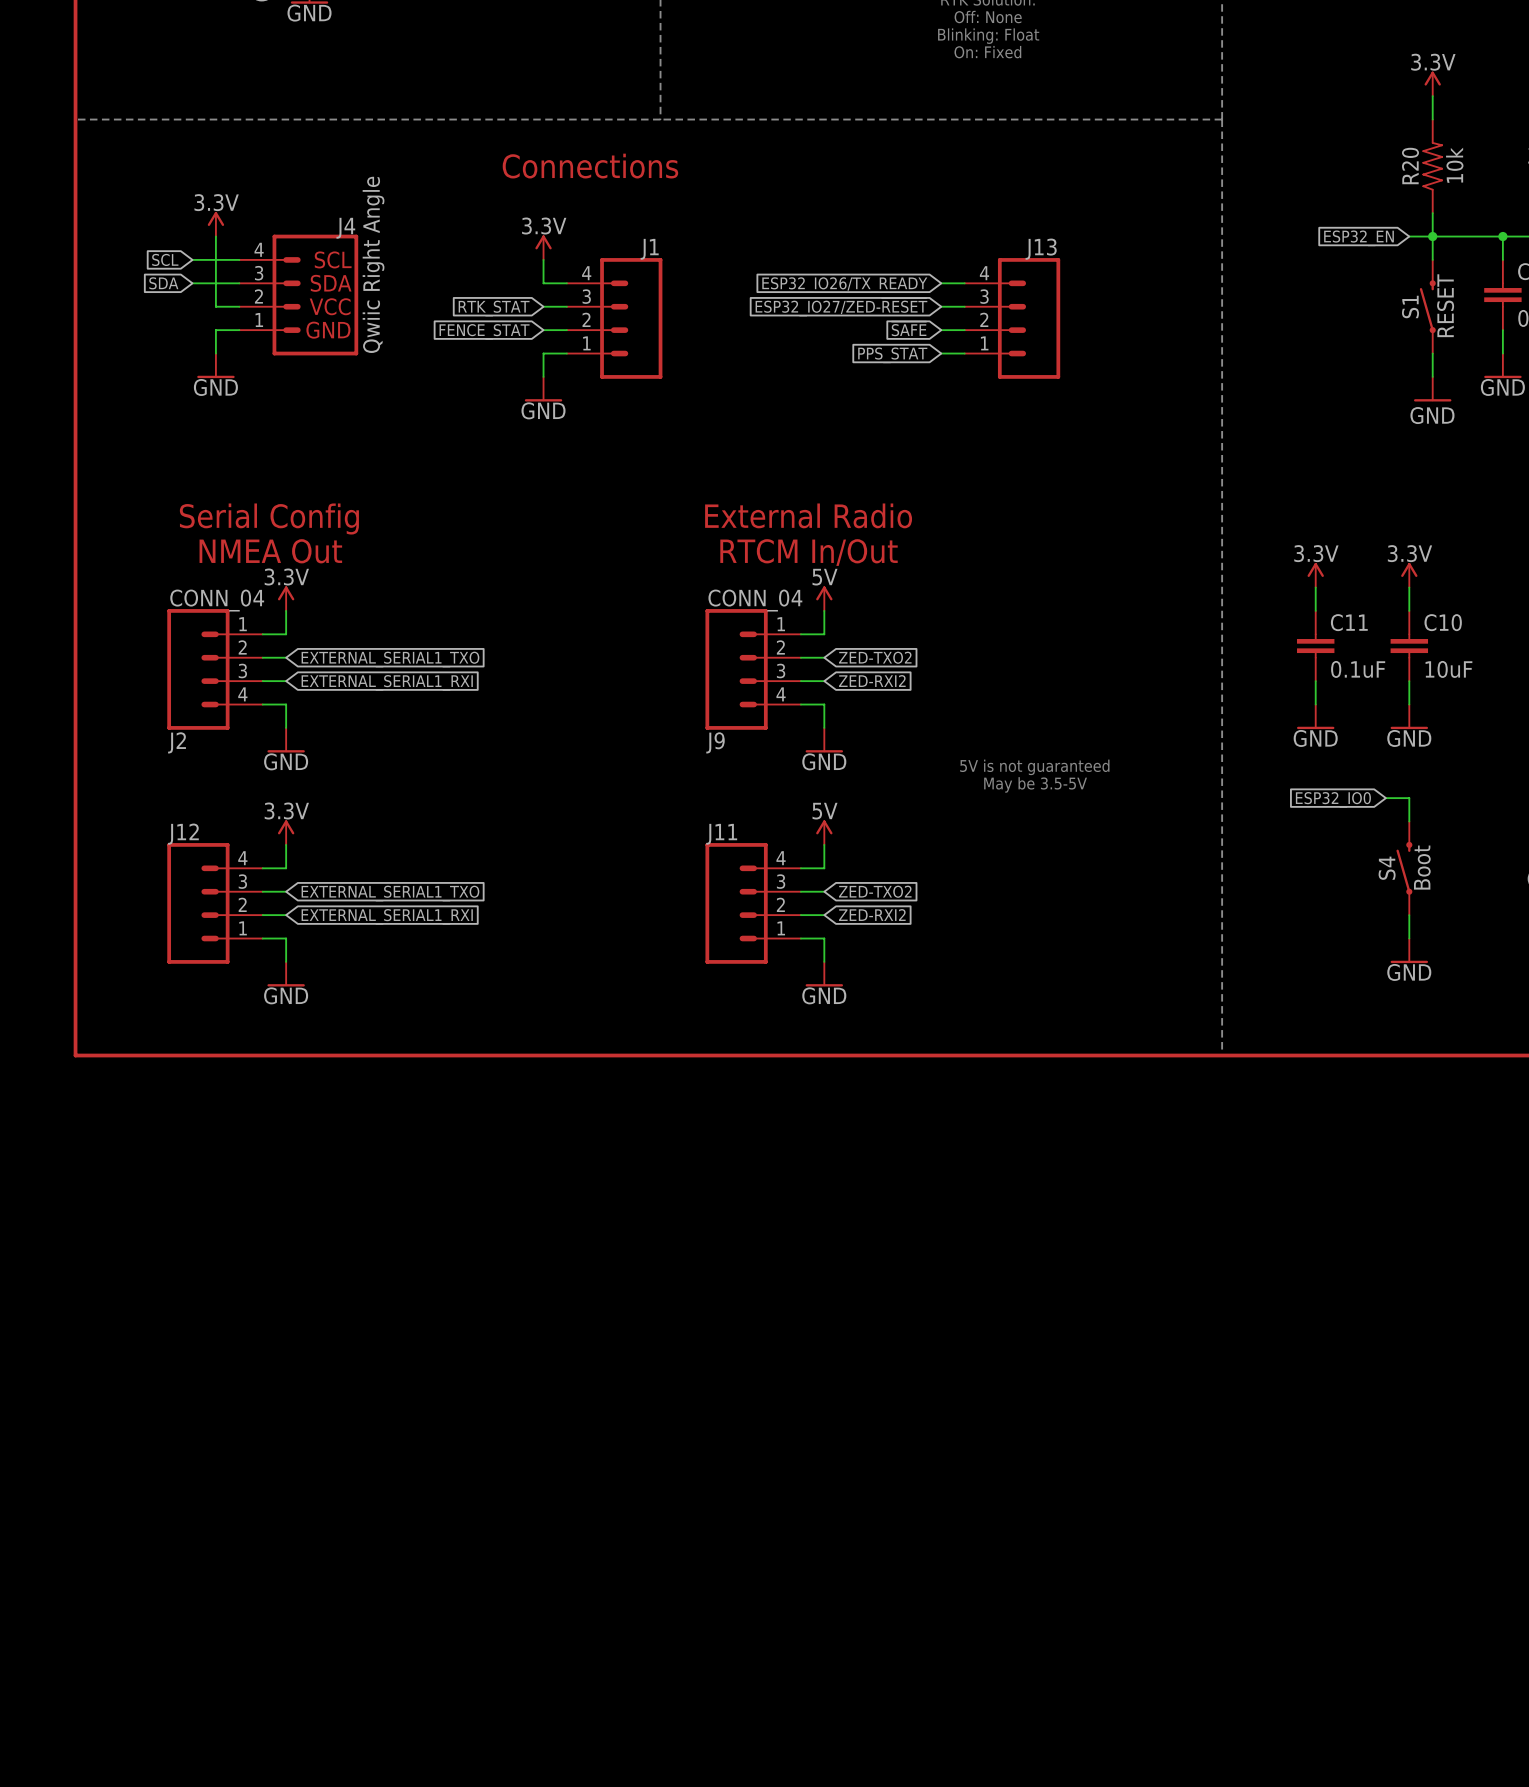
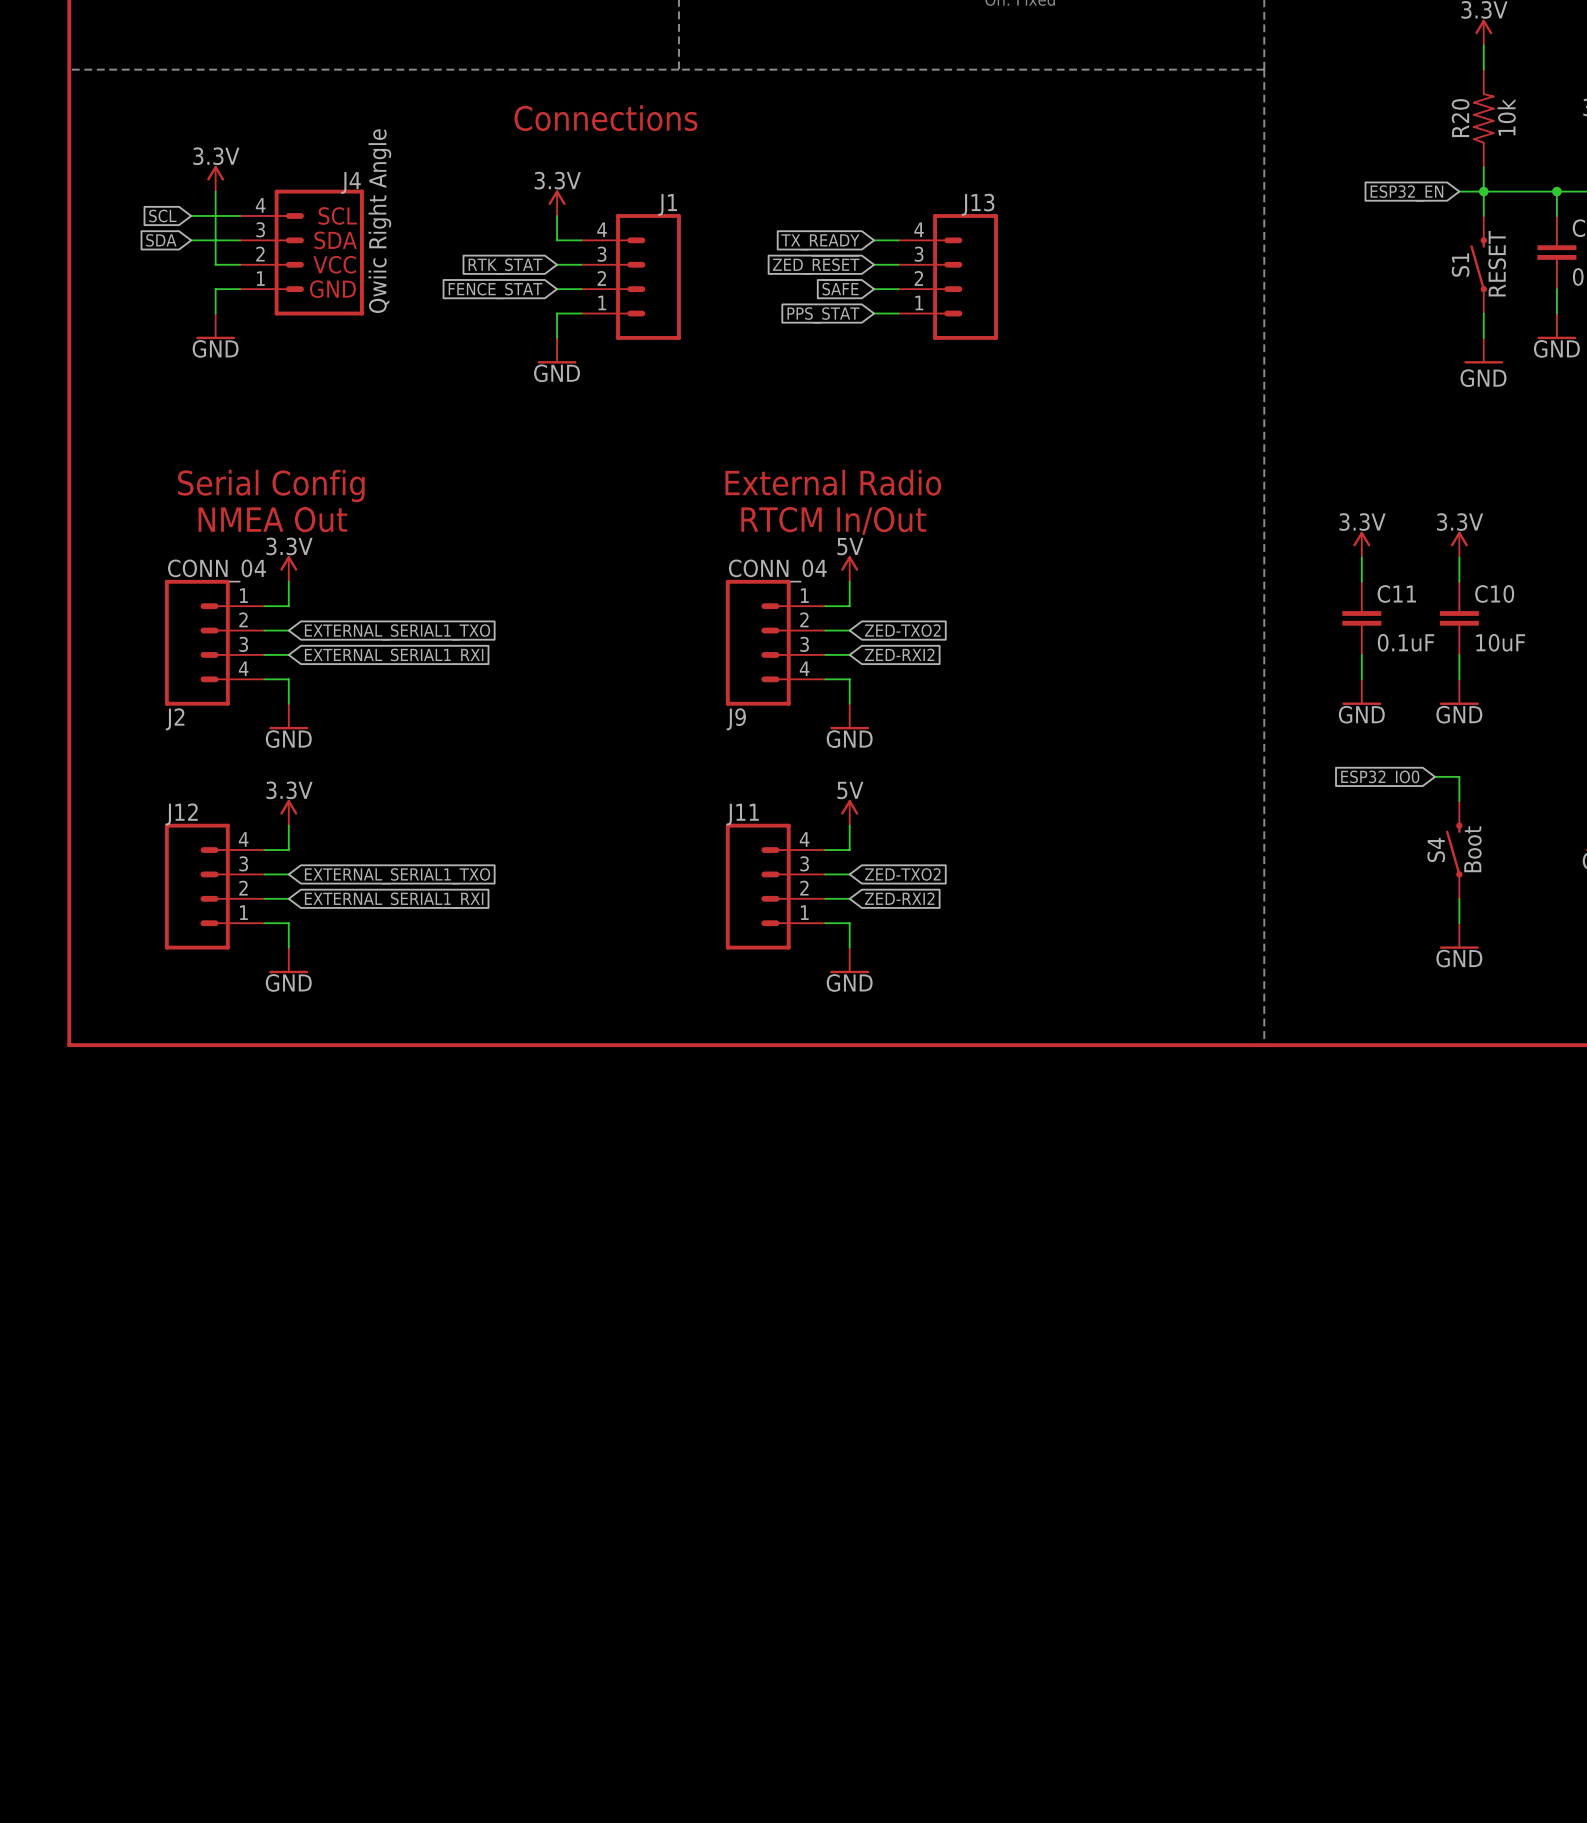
wire: (941, 283) (964, 283) -> (874, 240) (898, 240)
global label: none -> TX_READY (820, 242)
global label: ESP32_IO26/TX_READY (844, 285) -> none
wire: (941, 306) (964, 306) -> (874, 264) (898, 264)
global label: ESP32_IO27/ZED-~{RESET} (841, 307) -> ZED_~{RESET} (816, 265)
J13 position: (1012, 318) -> (948, 276)
global label position: ~{SAFE} (909, 328) -> ~{SAFE} (840, 287)
wire: (941, 330) (964, 330) -> (874, 289) (898, 289)
wire: (941, 353) (964, 353) -> (874, 313) (898, 313)
global label position: PPS_STAT (892, 355) -> PPS_STAT (823, 315)
text: 5V is not guaranteed (1034, 767) -> none
text: May be 3.5-5V (1035, 784) -> none

